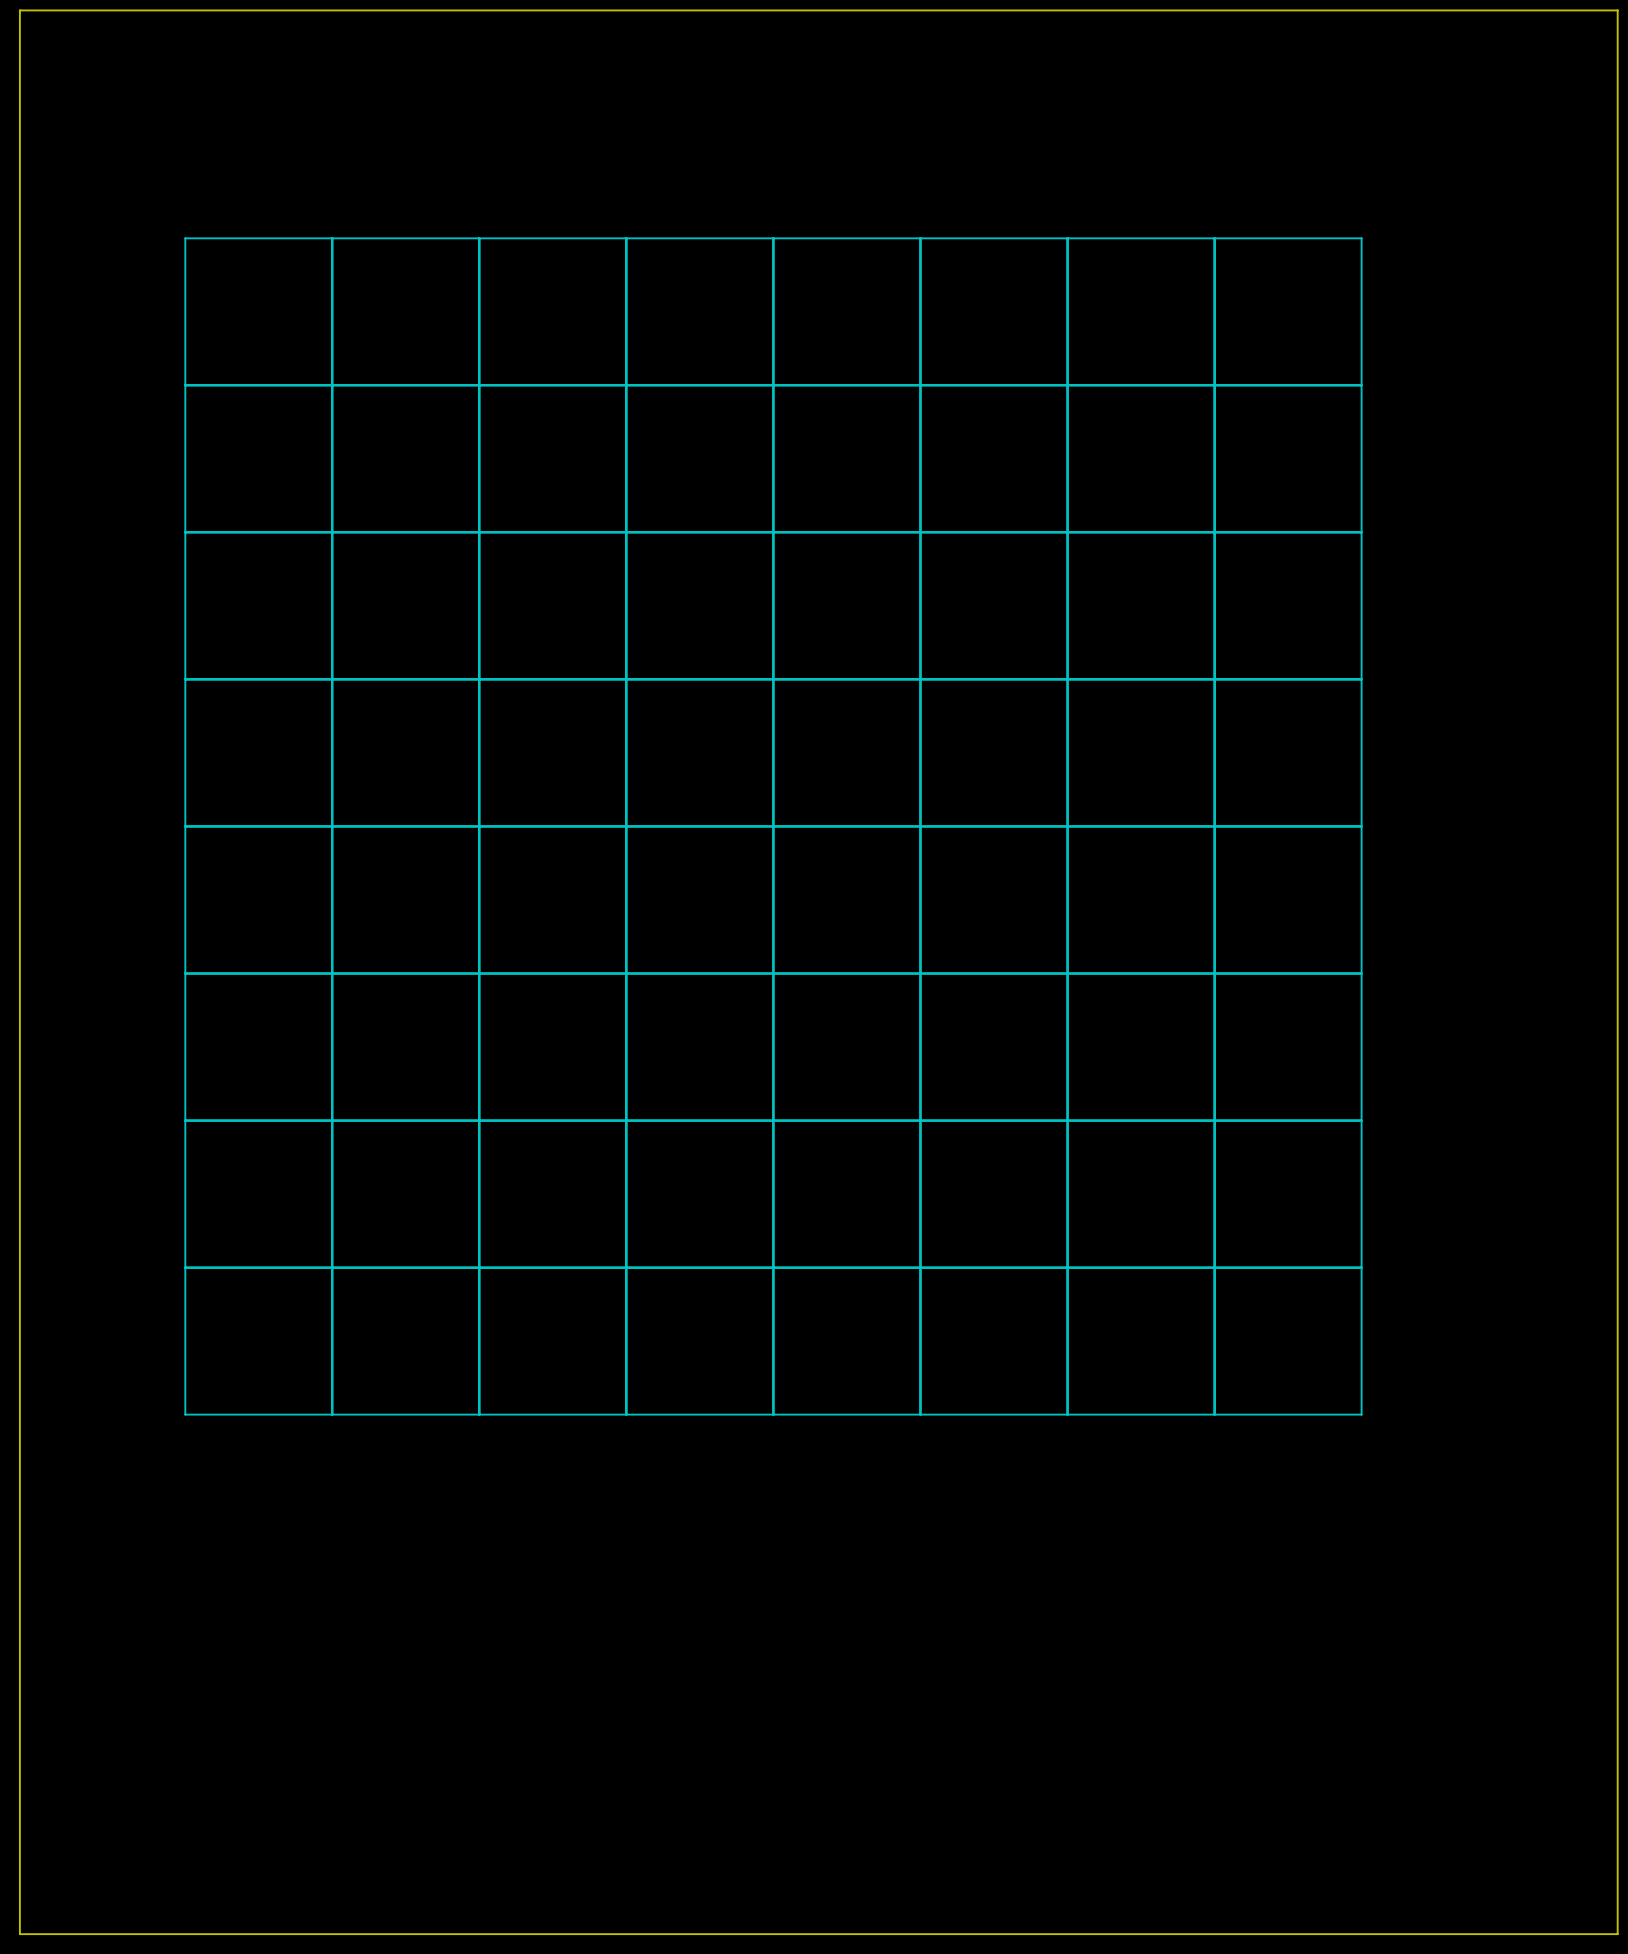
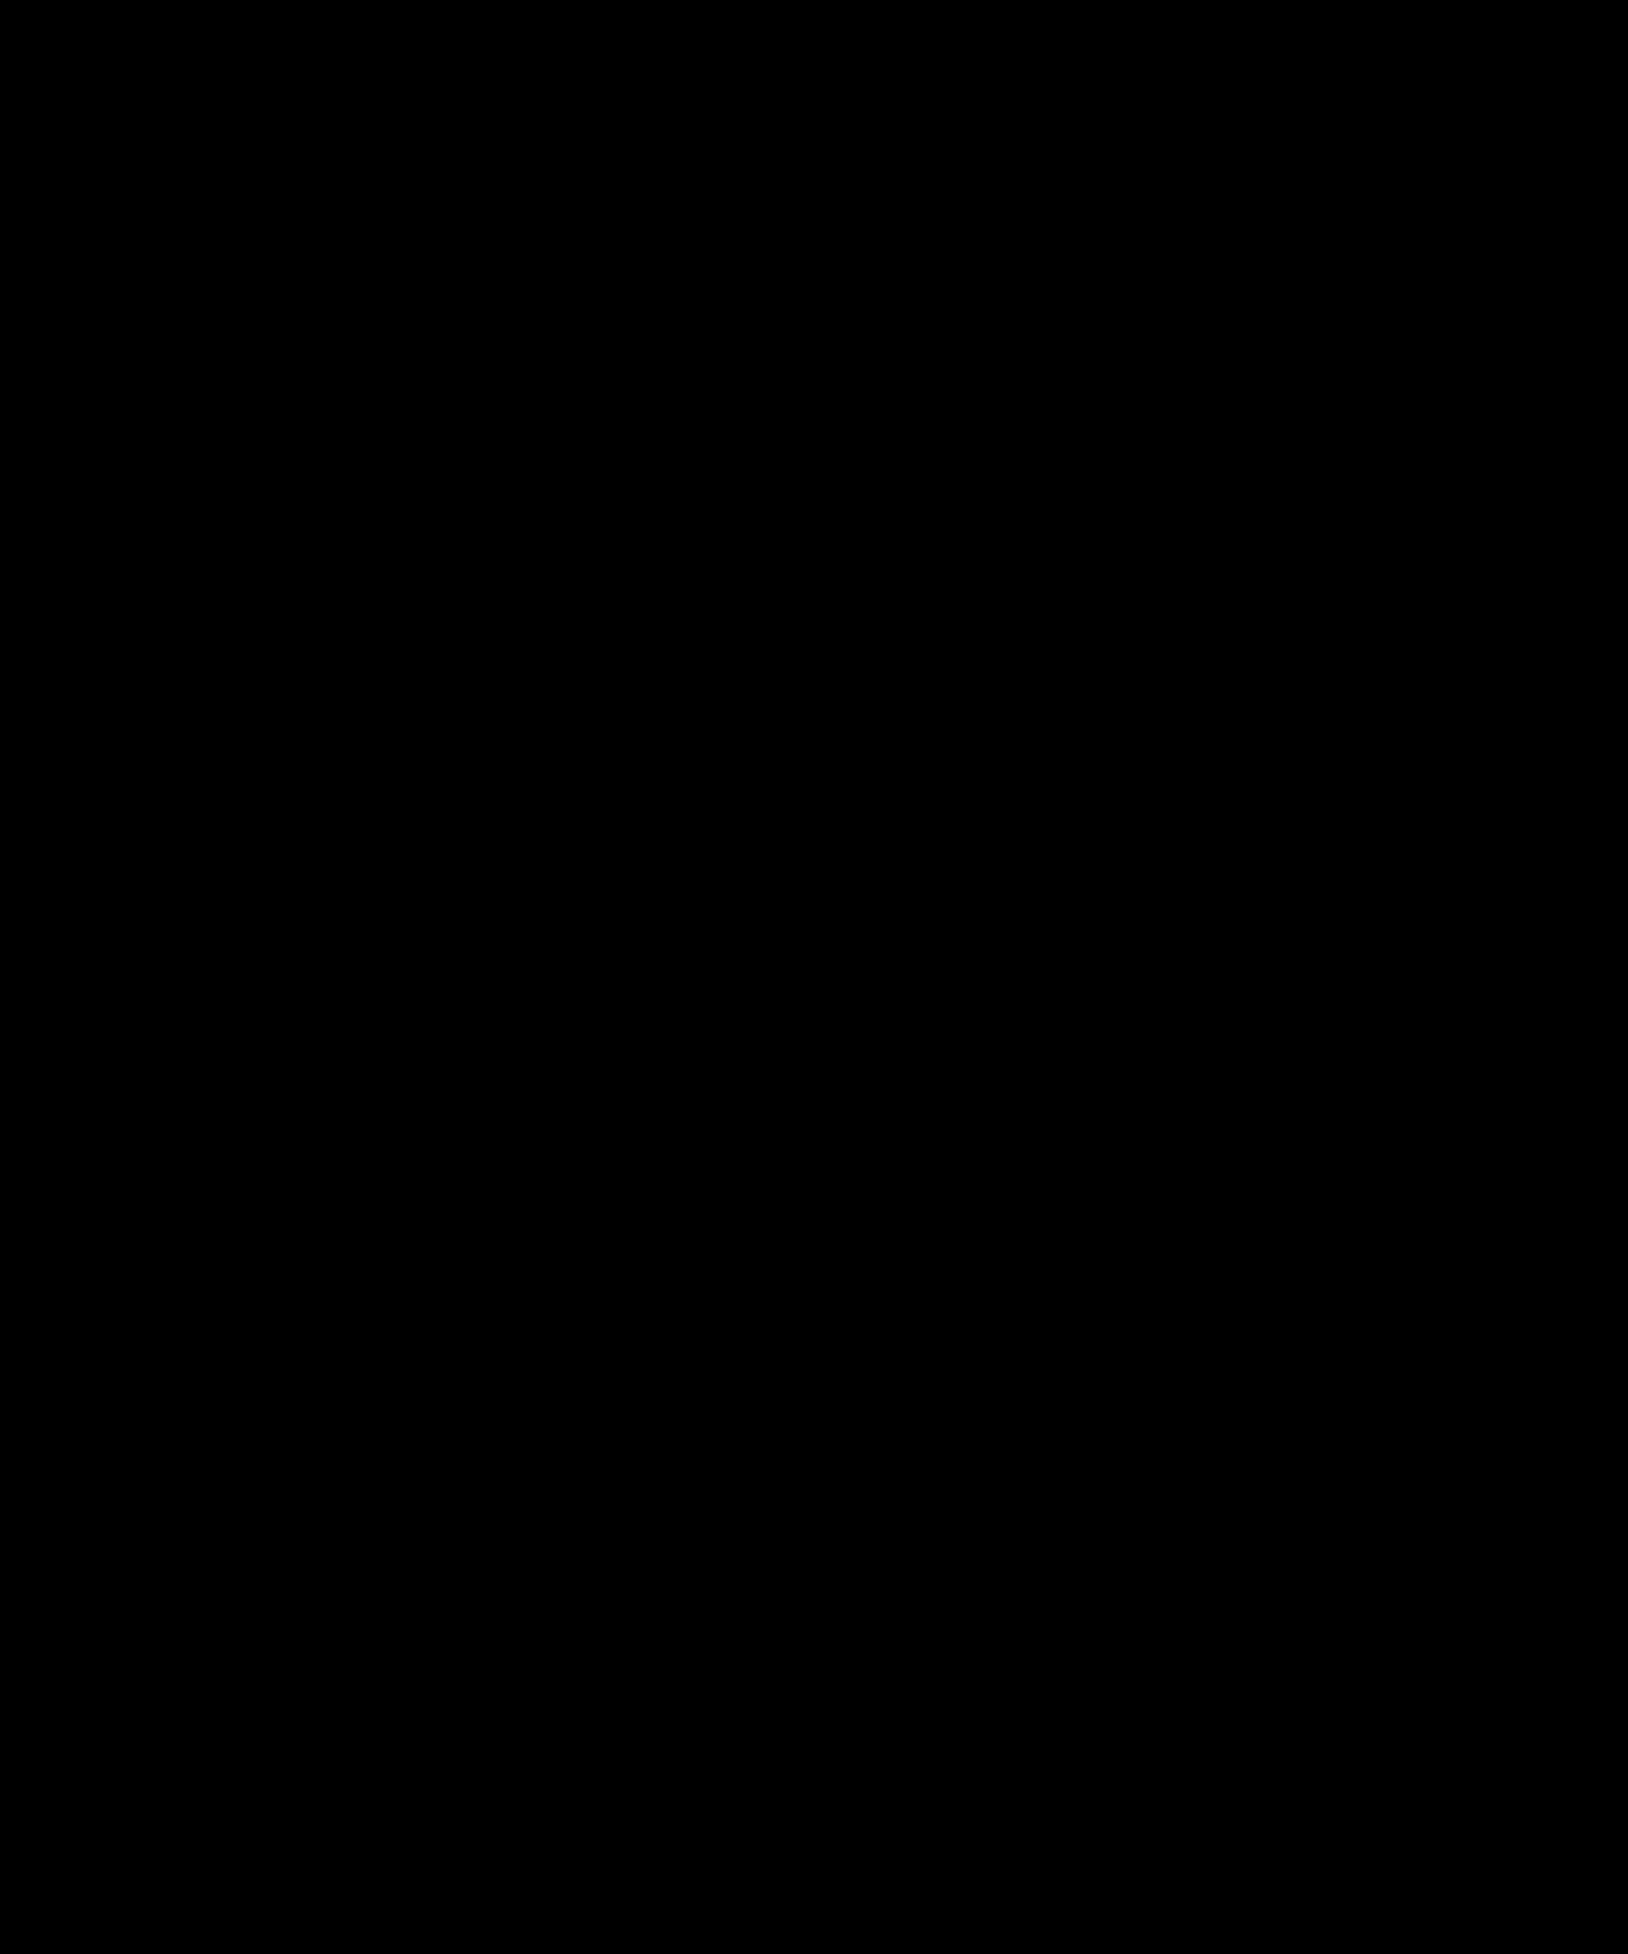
board edge: (19, 10) (1617, 10) (1617, 1934) (19, 1934) (19, 10) -> none
line: (185, 238) (1361, 238) (1361, 1414) (185, 1414) (185, 238) -> none
line: (332, 238) (332, 1414) -> none
line: (479, 238) (479, 1414) -> none
line: (626, 238) (626, 1414) -> none
line: (773, 238) (773, 1414) -> none
line: (920, 238) (920, 1414) -> none
line: (1067, 238) (1067, 1414) -> none
line: (1214, 238) (1214, 1414) -> none
line: (185, 385) (1361, 385) -> none
line: (185, 532) (1361, 532) -> none
line: (185, 679) (1361, 679) -> none
line: (185, 826) (1361, 826) -> none
line: (185, 973) (1361, 973) -> none
line: (185, 1120) (1361, 1120) -> none
line: (185, 1267) (1361, 1267) -> none

